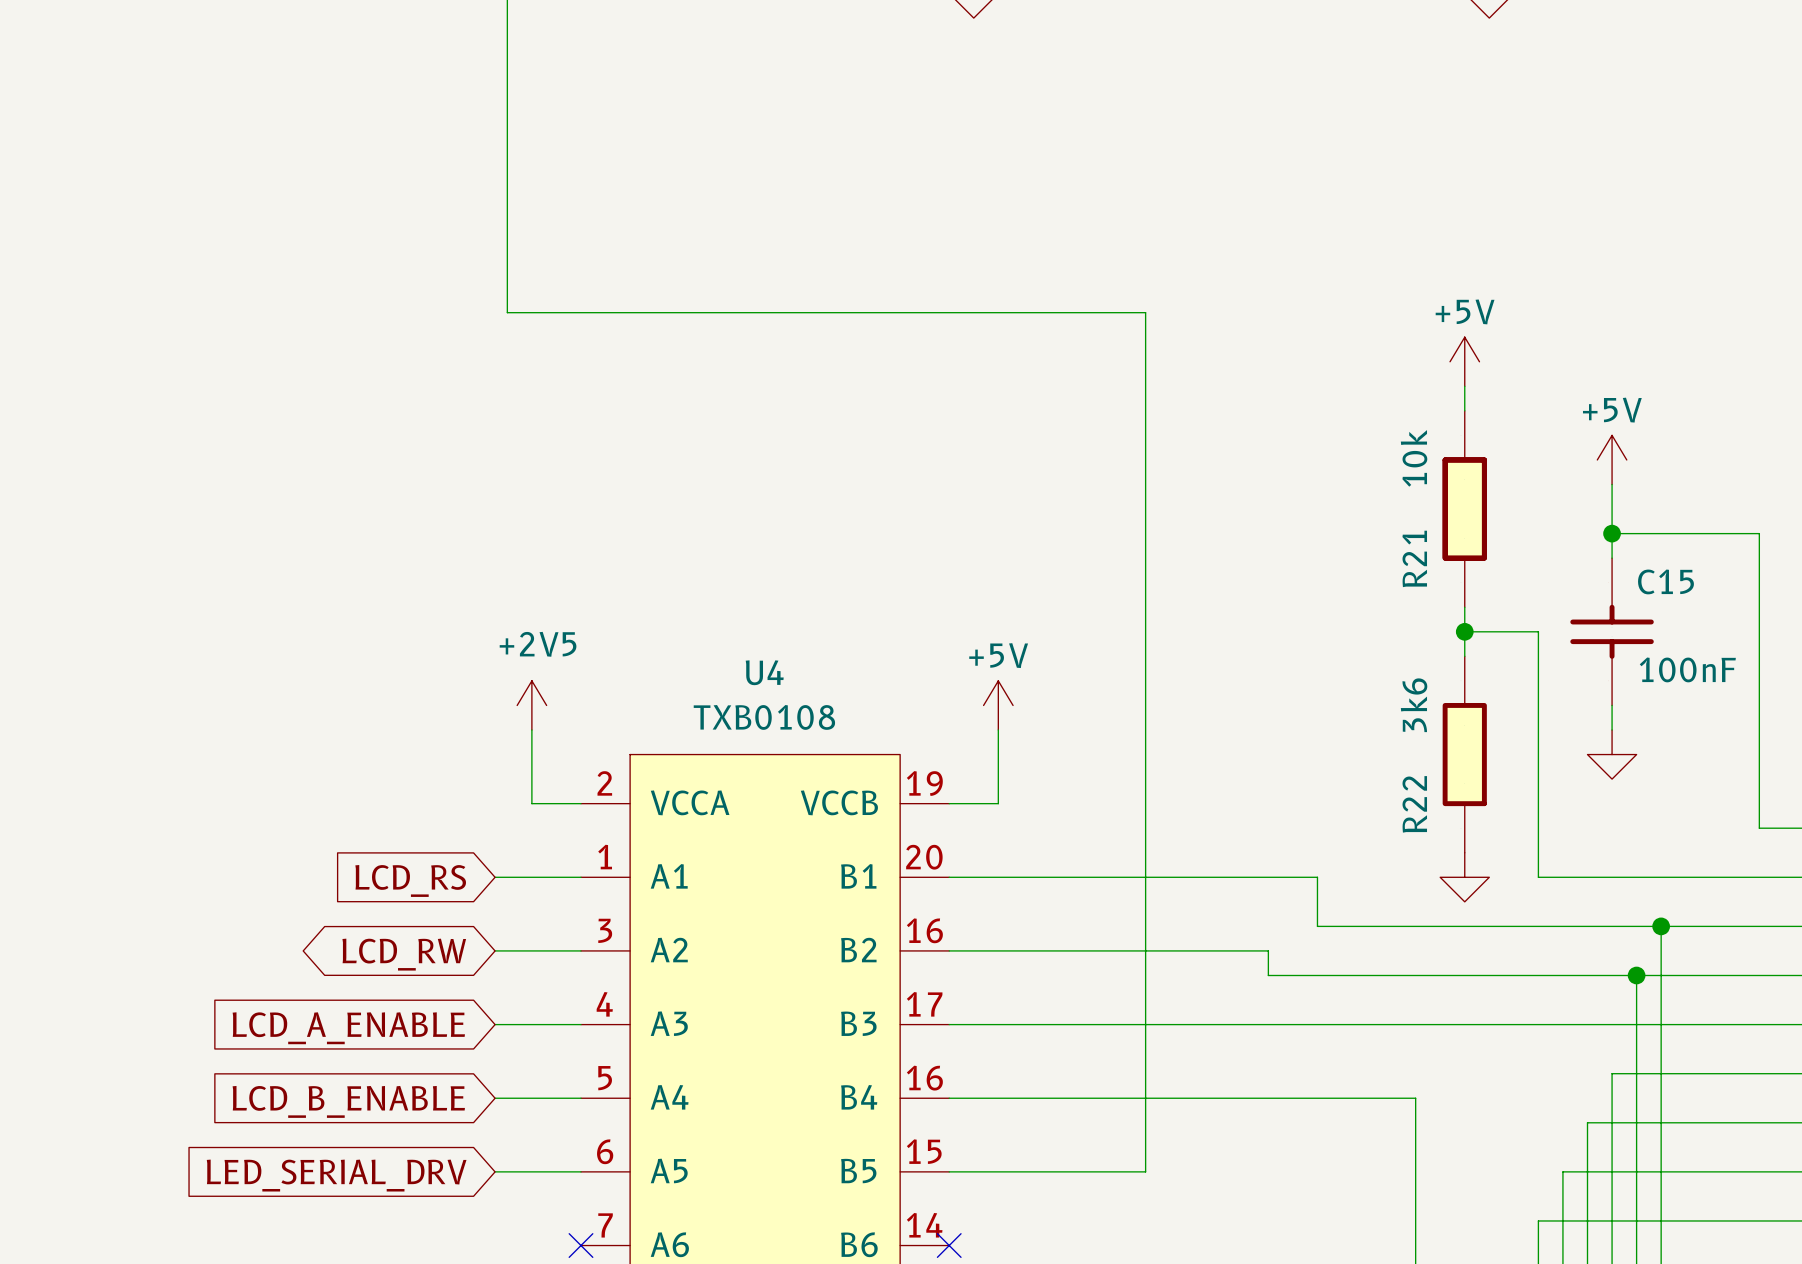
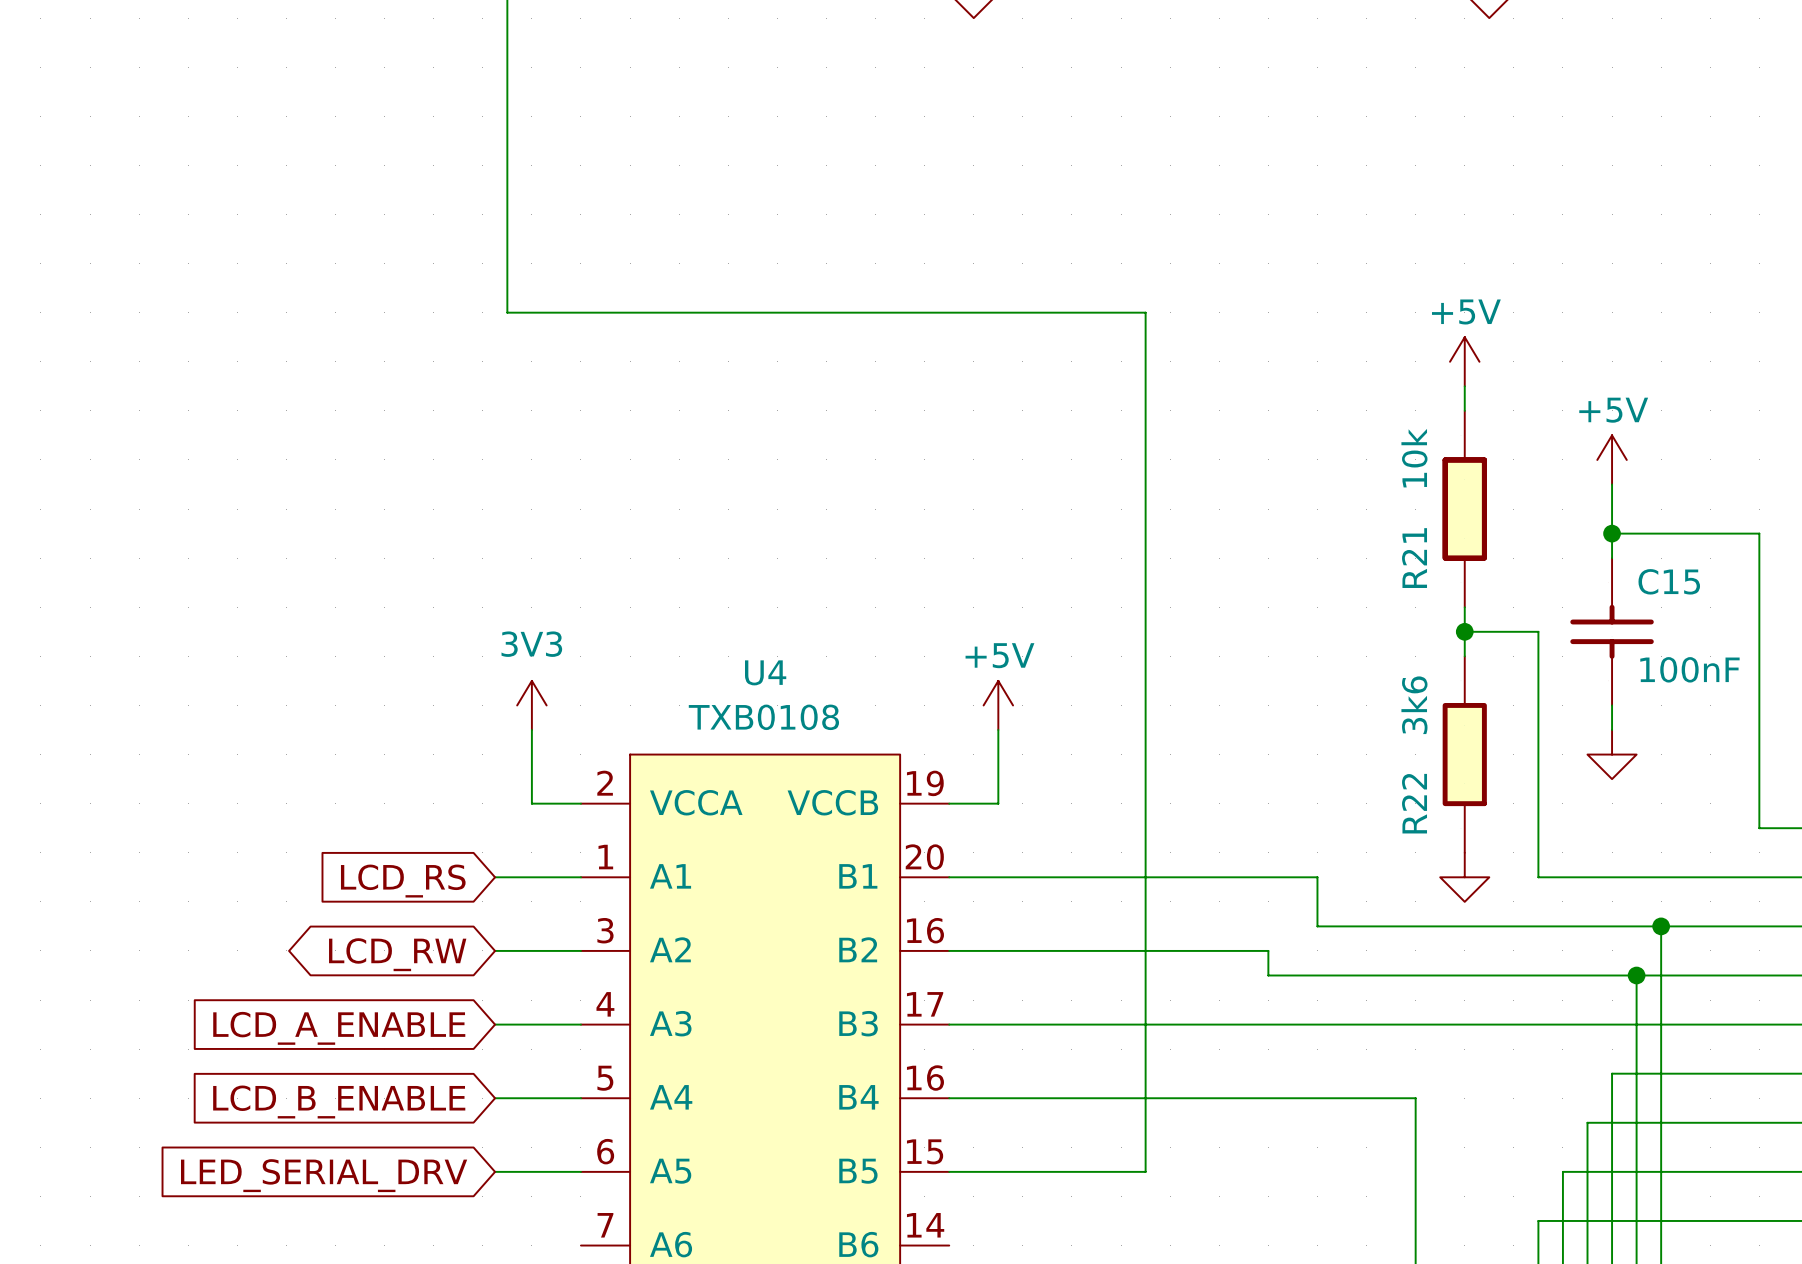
power symbol: +2V5 (531, 705) -> 3V3 (531, 705)
no-connect mark: (580, 1245) -> none
no-connect mark: (949, 1245) -> none

